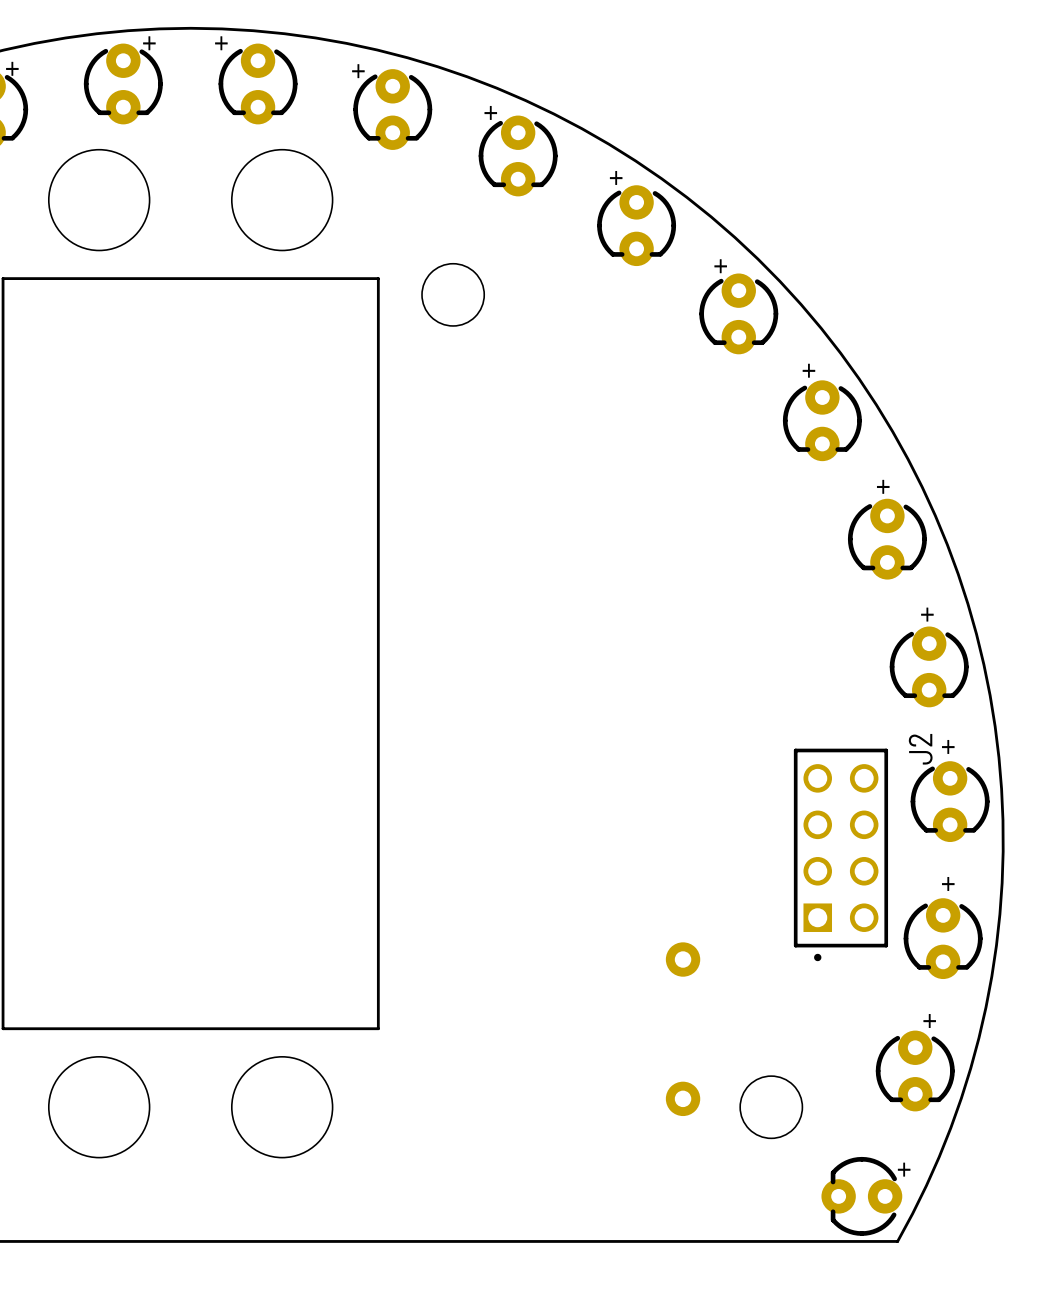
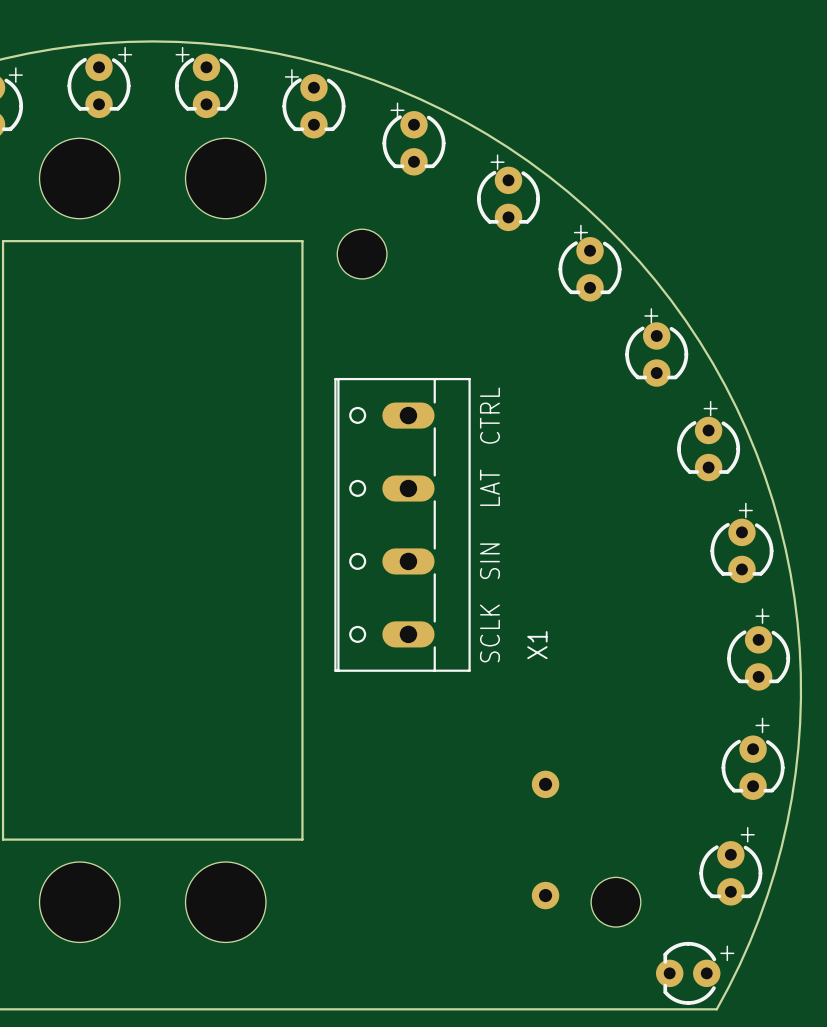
text: none -> CTRL (489, 415)
text: none -> LAT (489, 487)
X1: none -> (402, 524)
text: none -> SIN (489, 561)
text: none -> SCLK (489, 633)
J2: (840, 854) -> none

